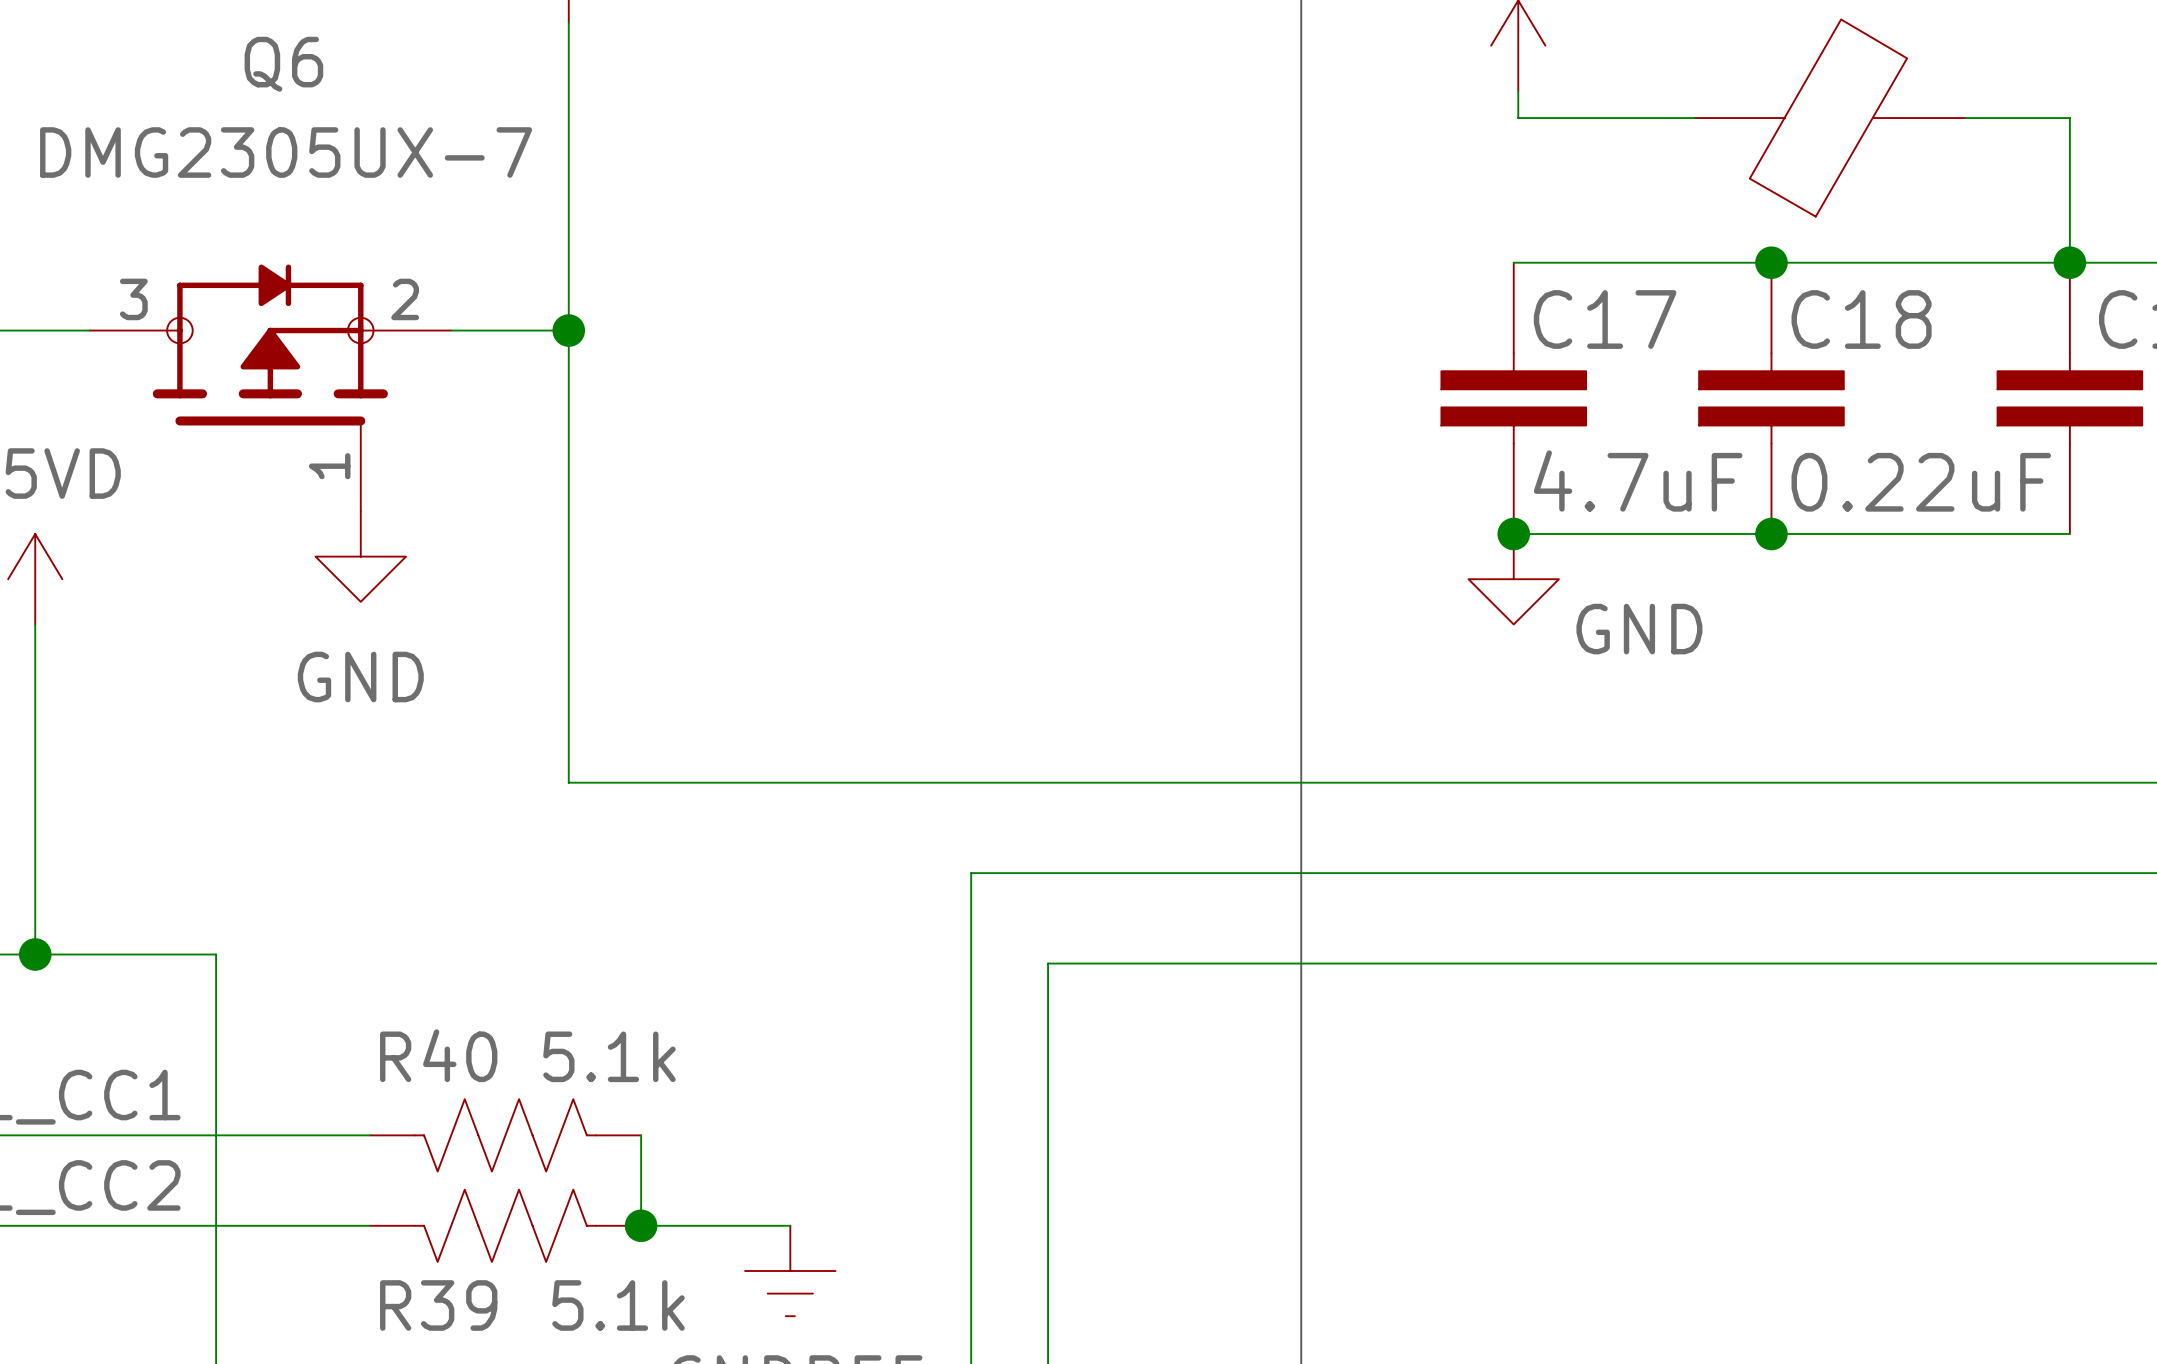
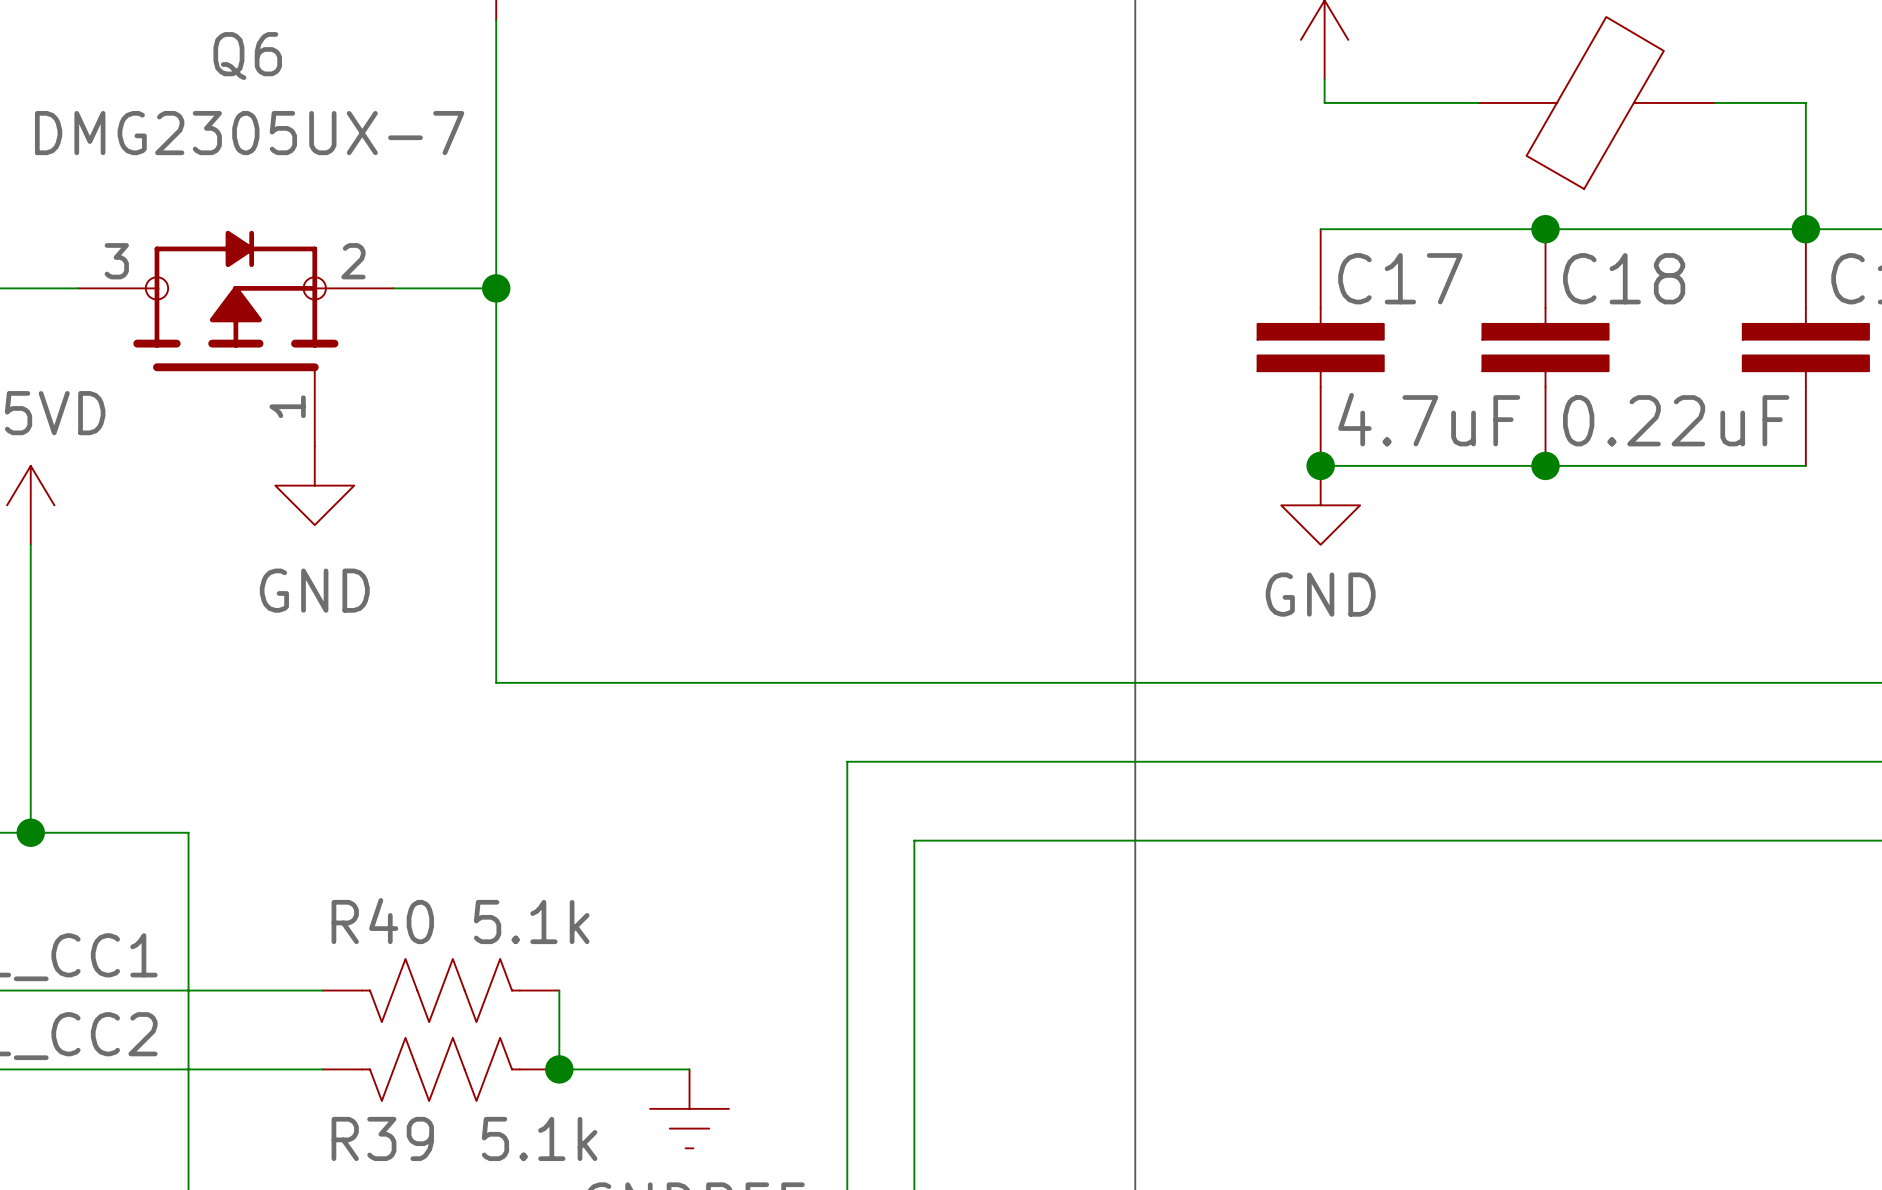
power symbol text position: GND (1639, 629) -> GND (1320, 594)

